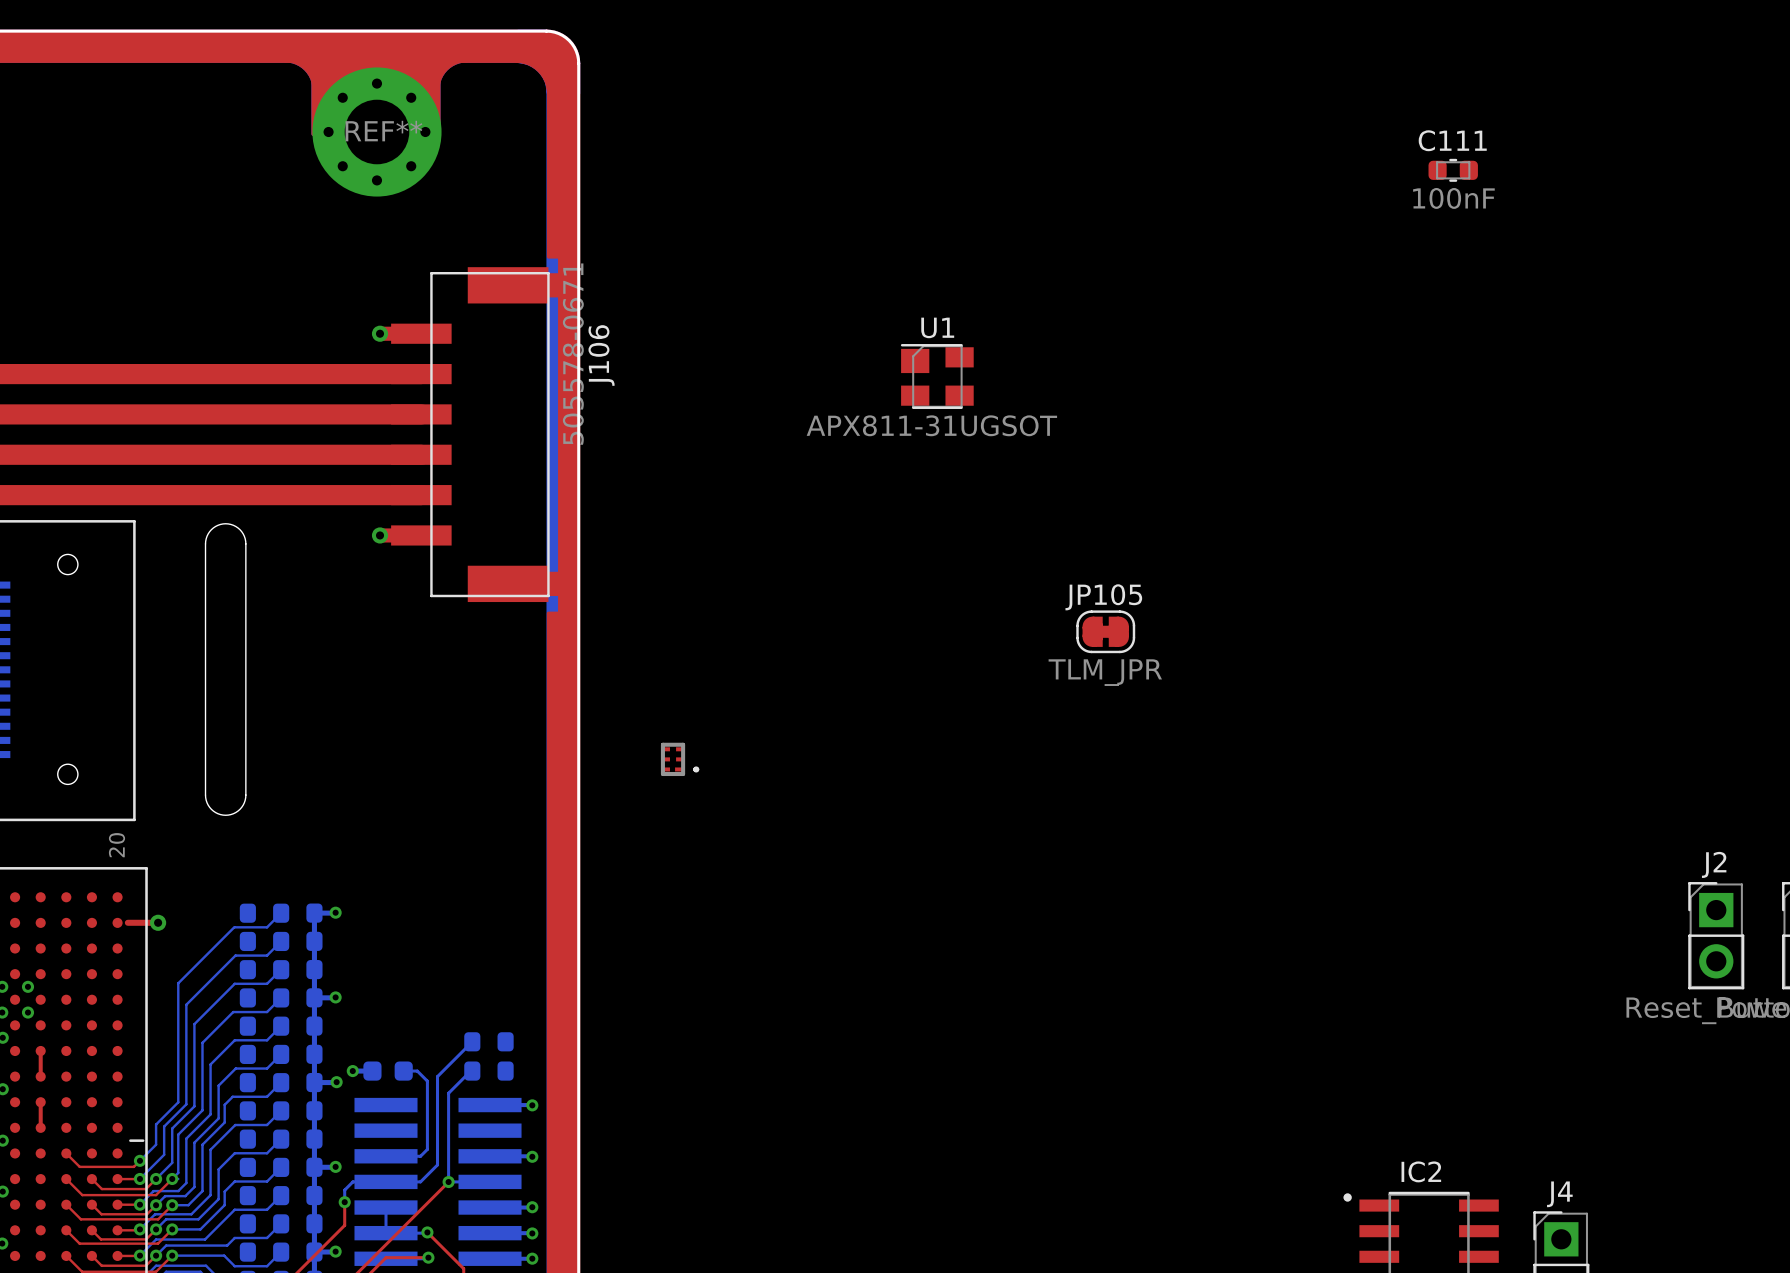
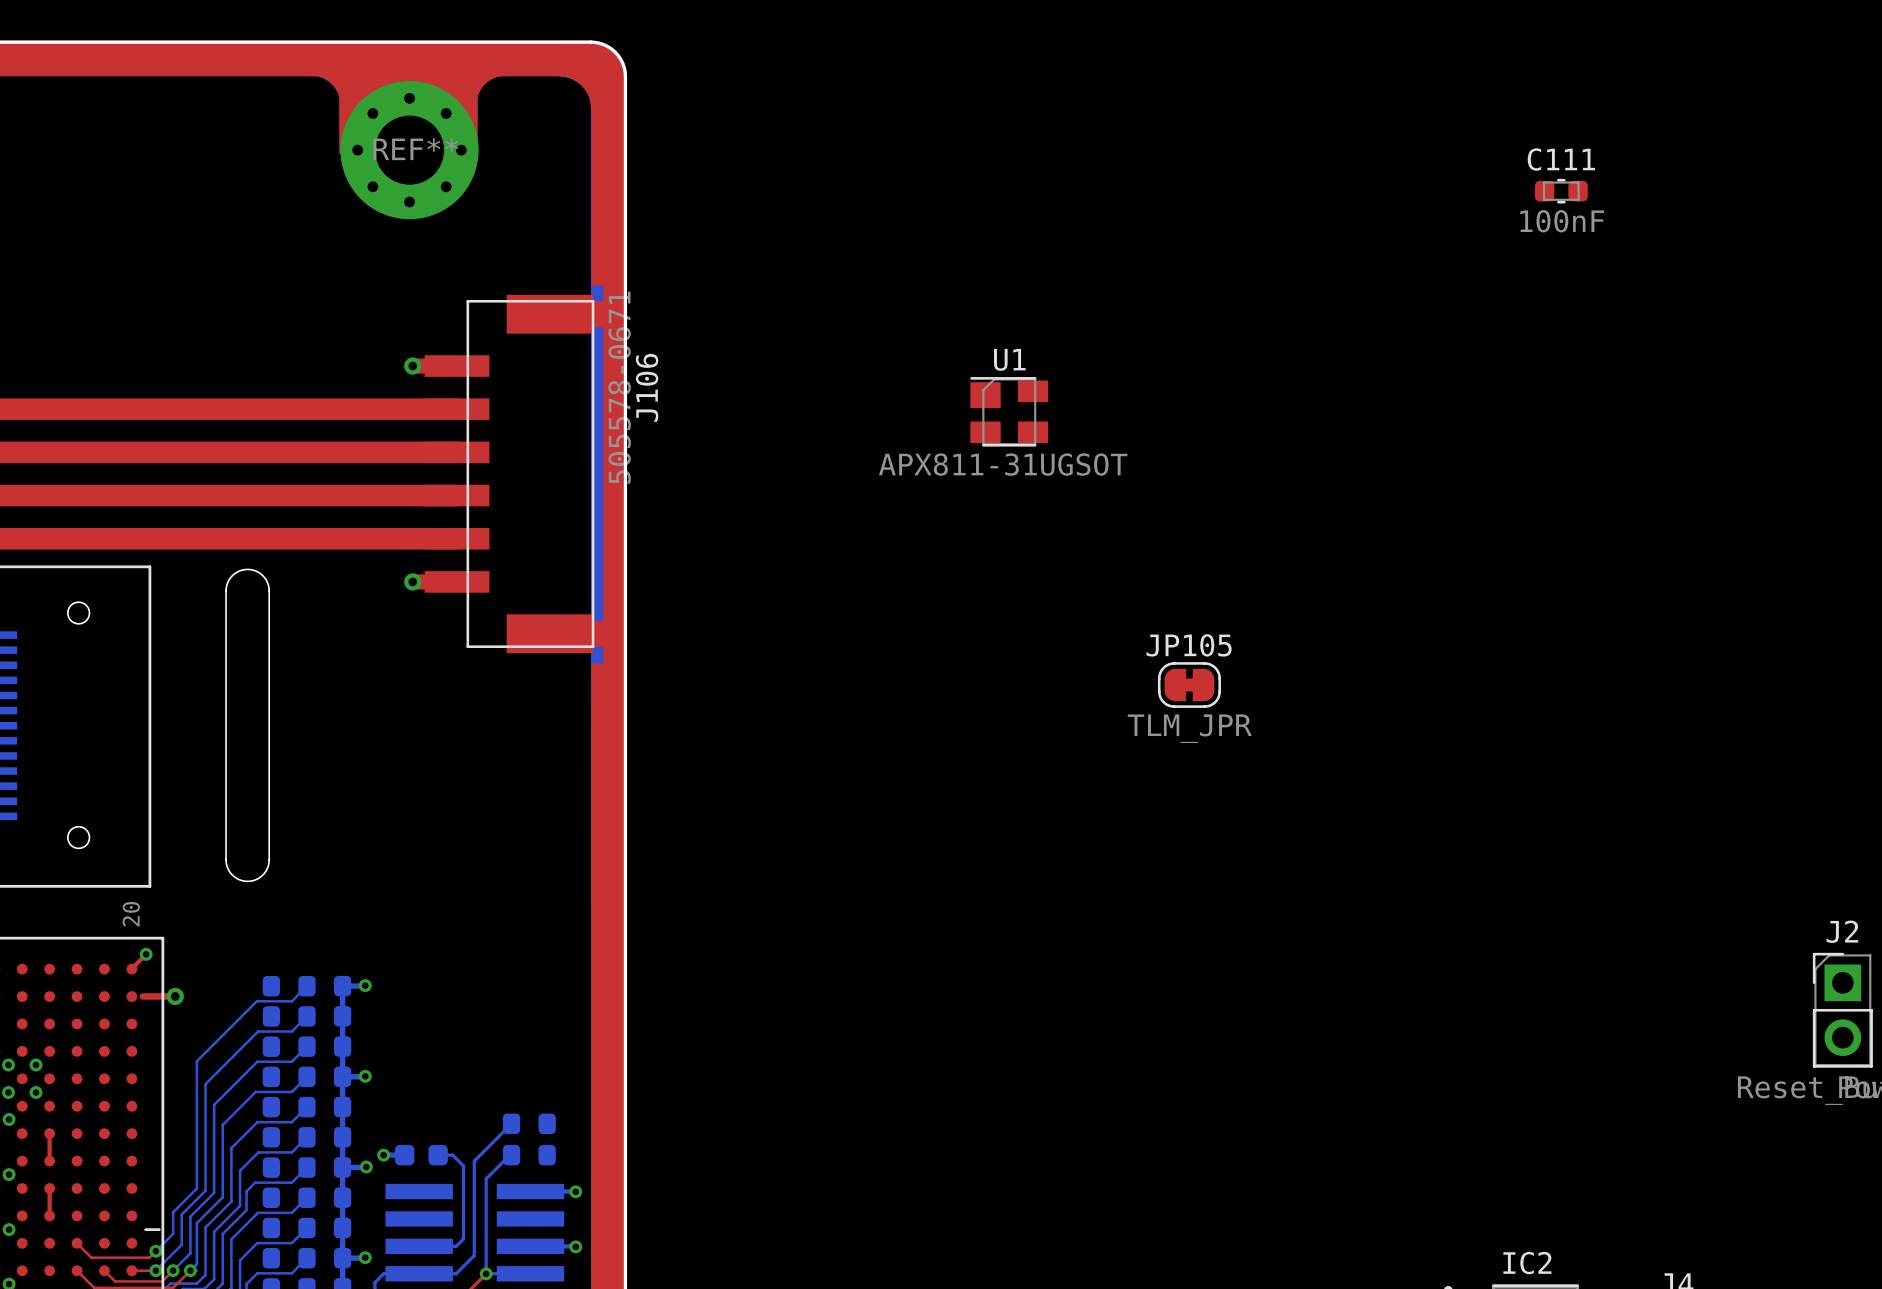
part: (680, 759) -> none
top track: none -> (146, 954) (131, 969)
via: none -> (146, 954)

